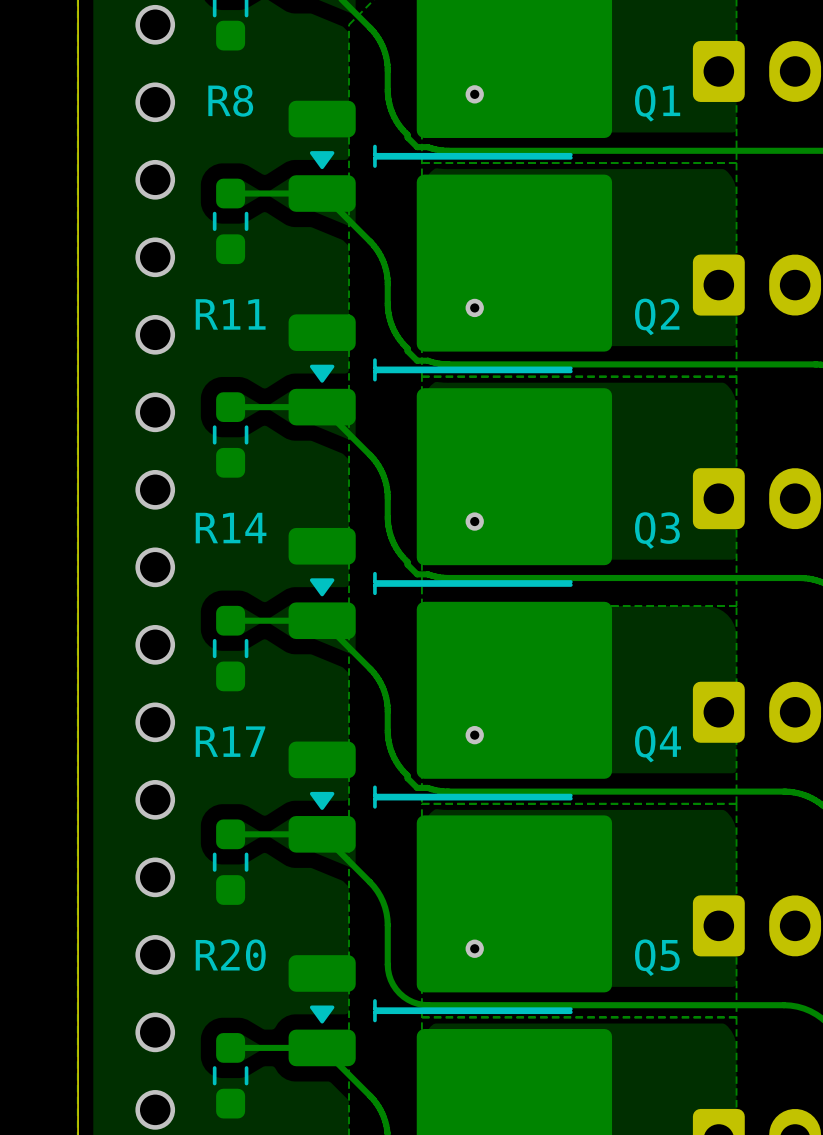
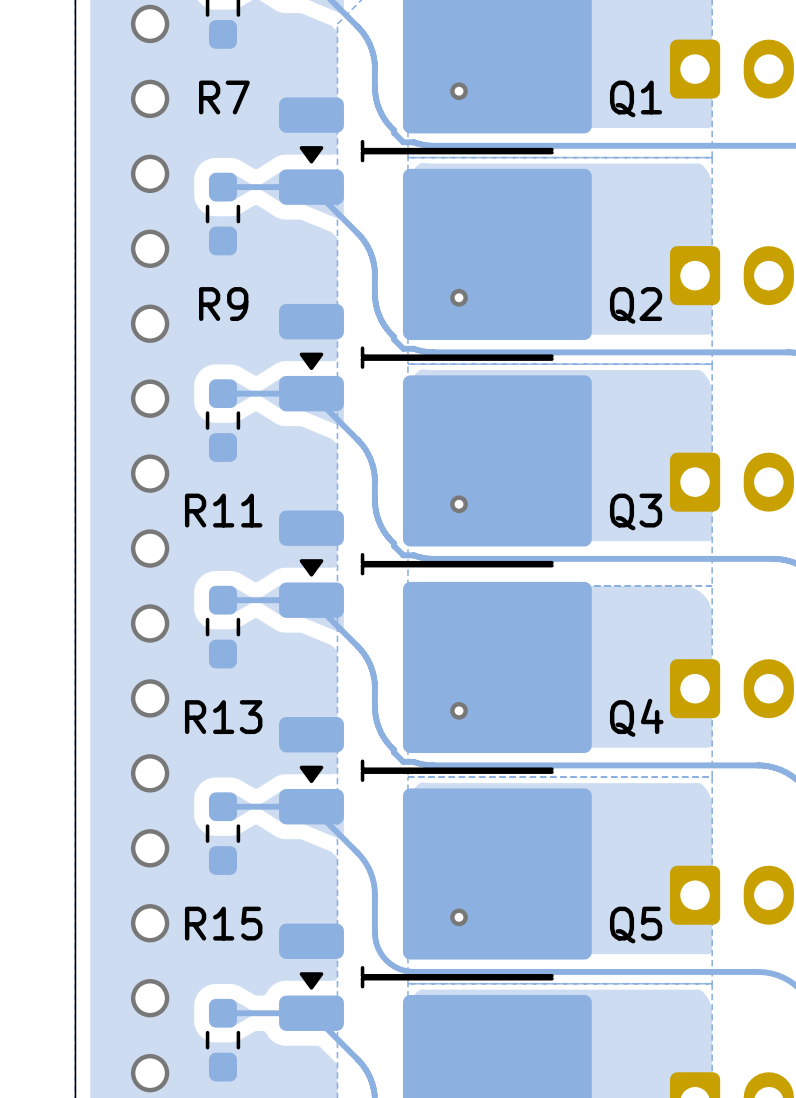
R8 name: R8 (230, 100) -> R7 (224, 97)
R11 name: R11 (230, 314) -> R9 (223, 304)
R14 name: R14 (231, 528) -> R11 (223, 510)
R17 name: R17 (230, 741) -> R13 (223, 717)
R20 name: R20 (230, 955) -> R15 (223, 923)

